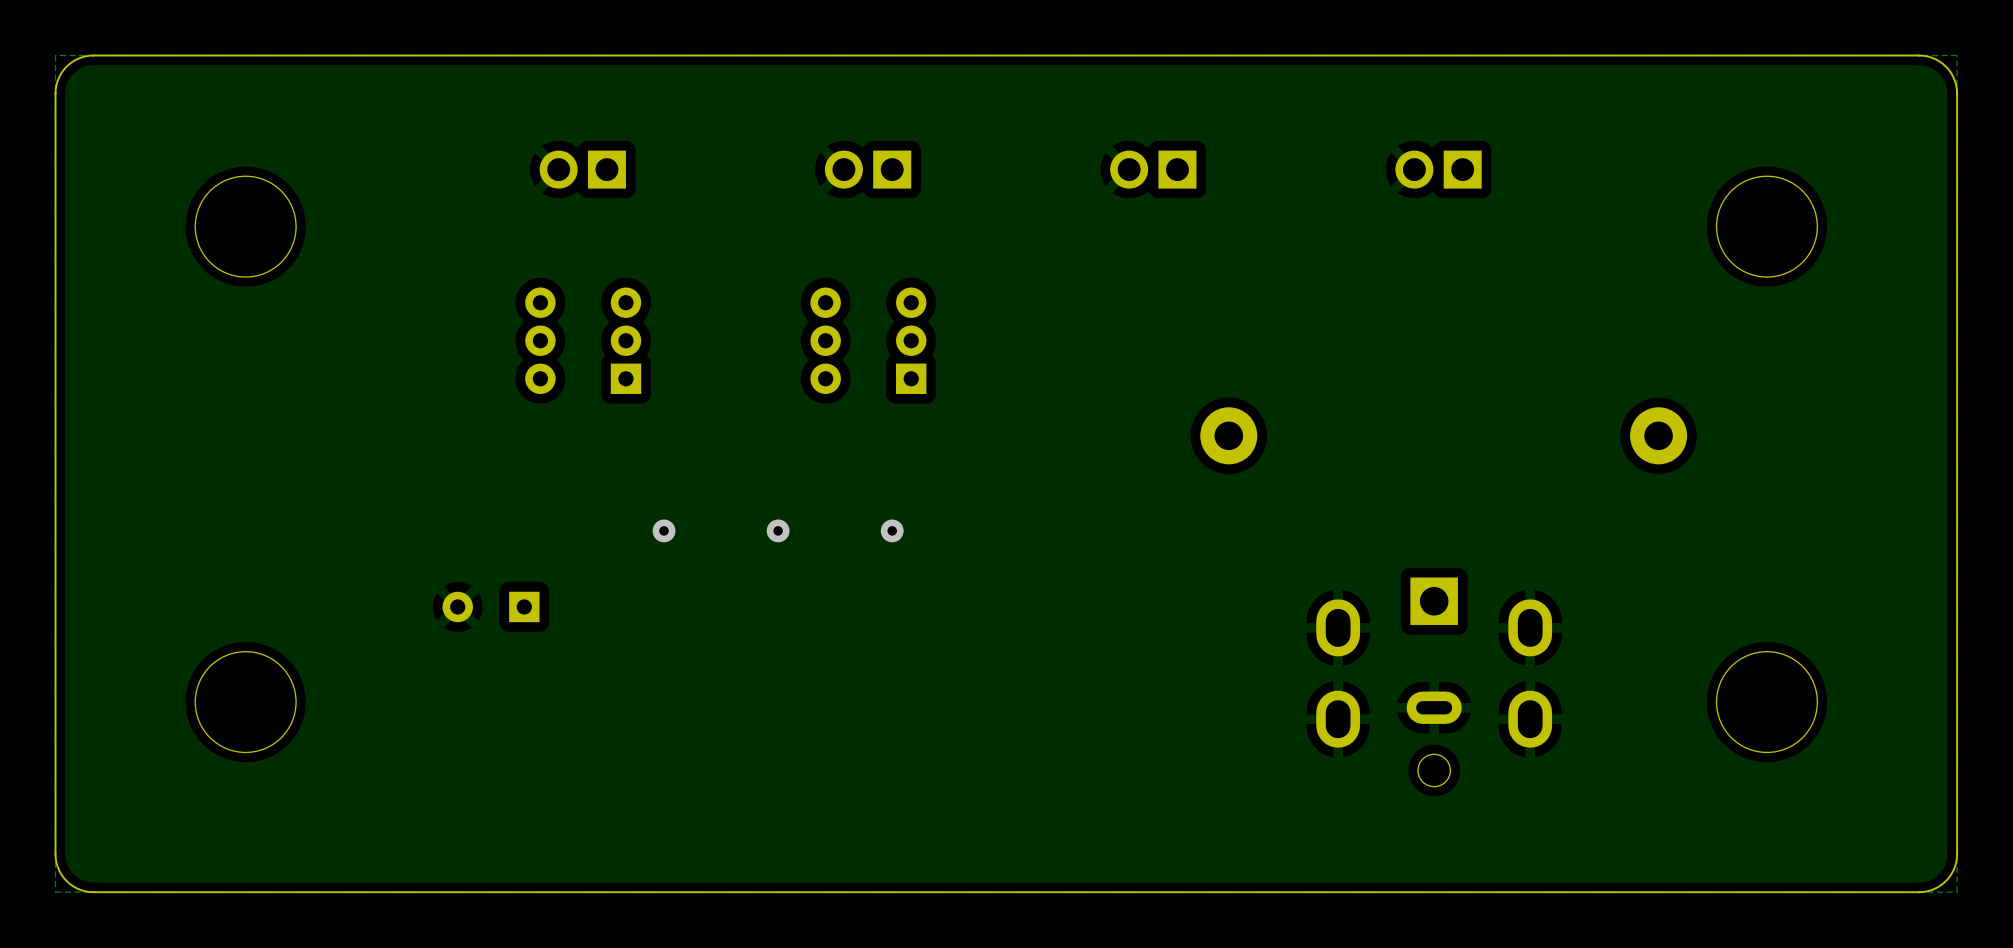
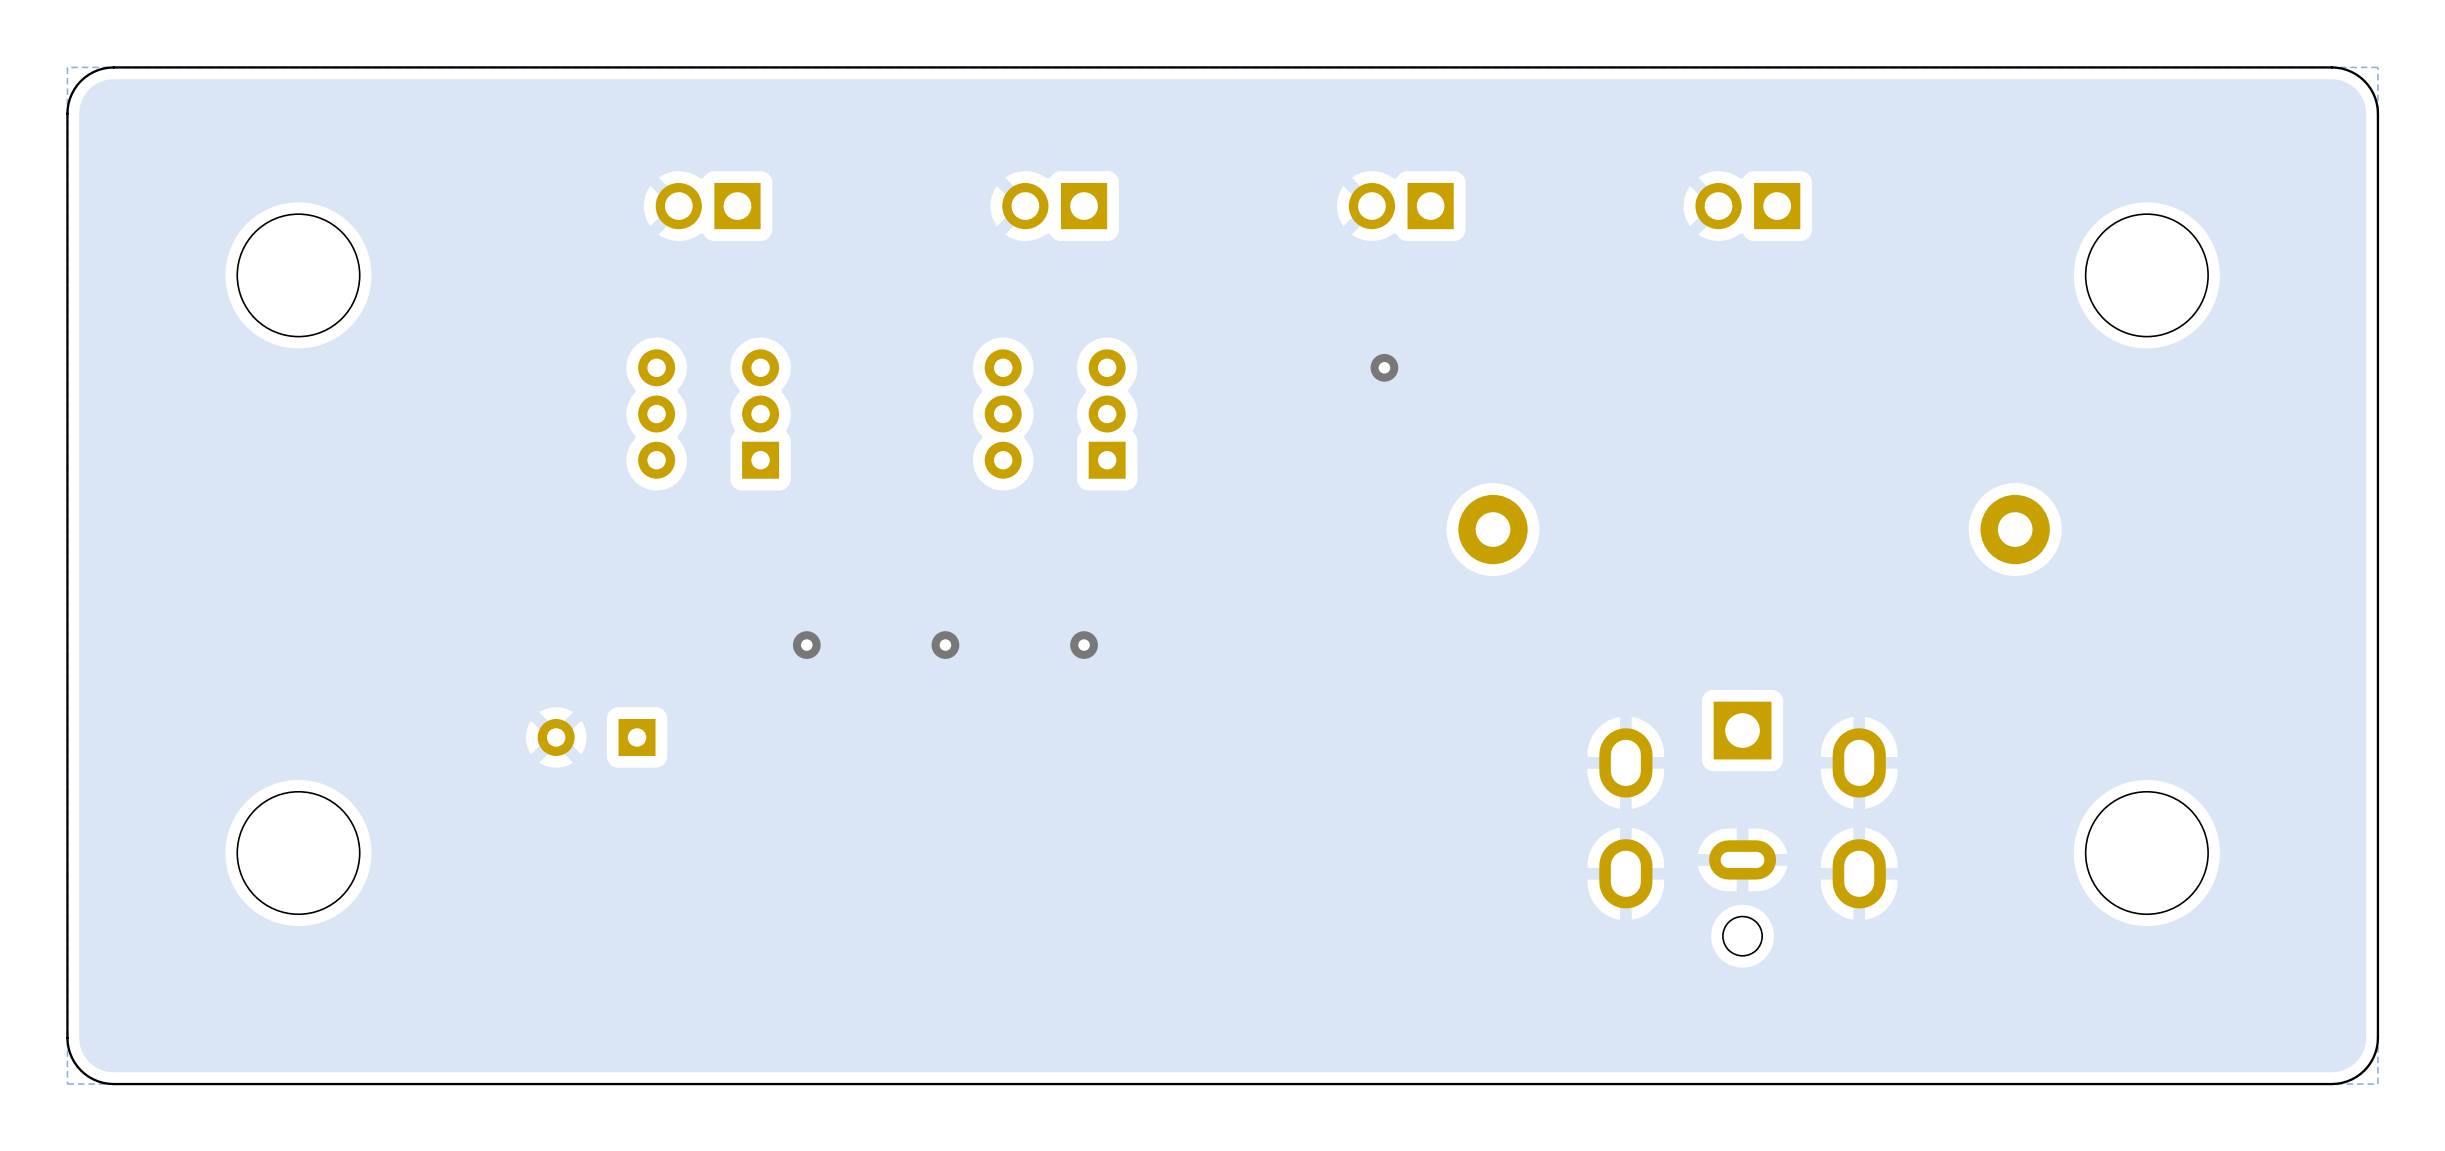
via: none -> (1384, 367)

